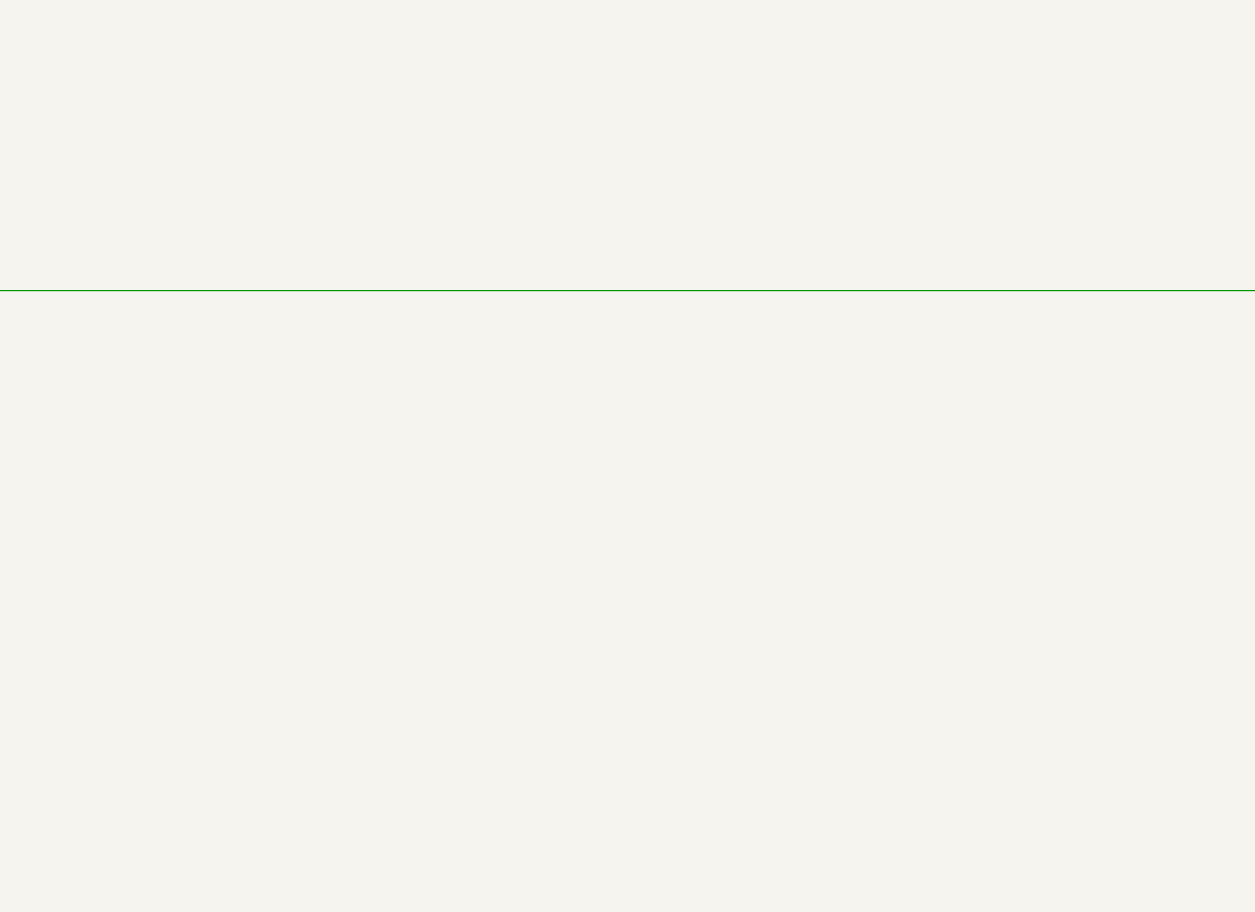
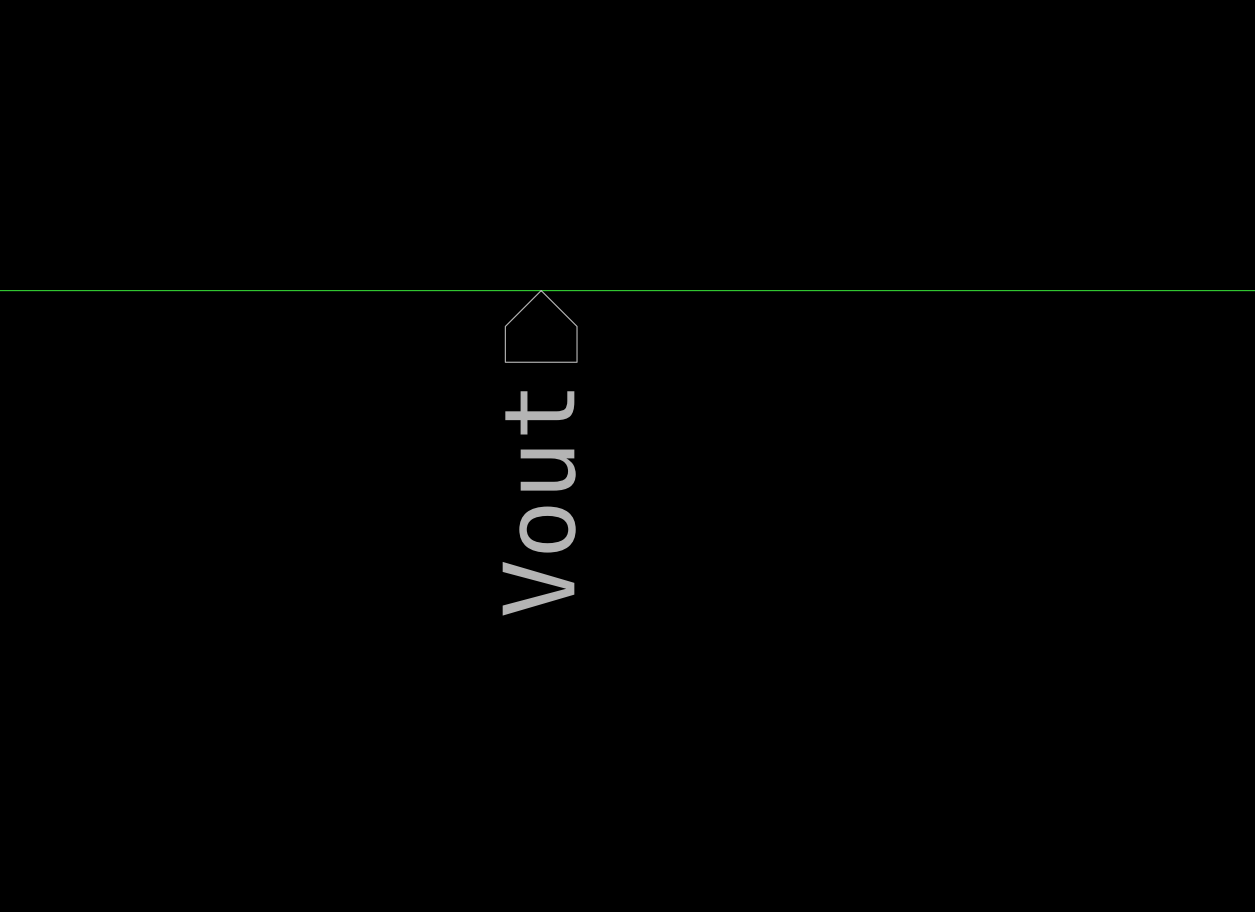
hierarchical label: none -> Vout (539, 503)

